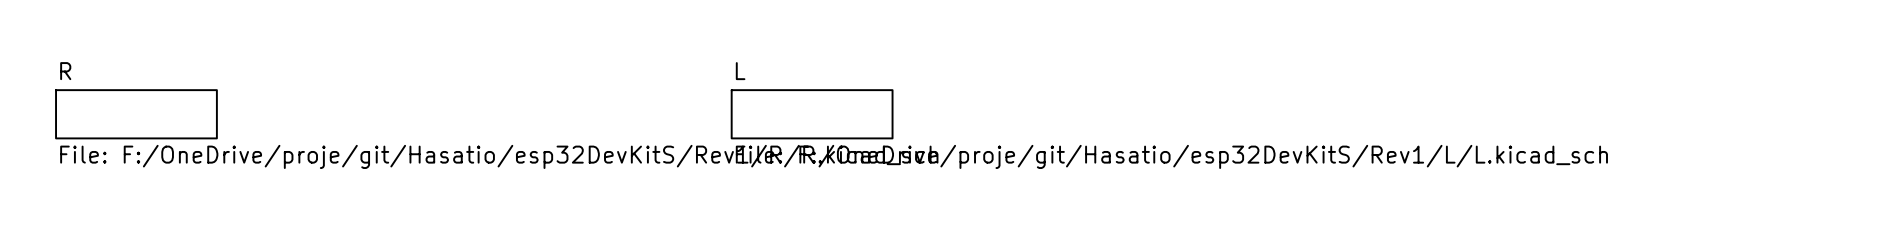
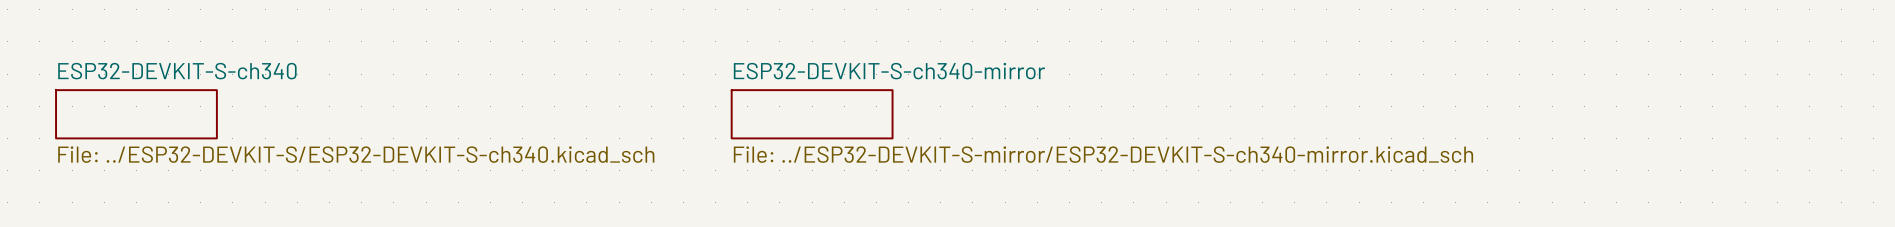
sheet R name: R (65, 71) -> ESP32-DEVKIT-S-ch340 (177, 71)
sheet L name: L (740, 71) -> ESP32-DEVKIT-S-ch340-mirror (889, 71)
sheet R value: File: F:/OneDrive/proje/git/Hasatio/esp32DevKitS/Rev1/R/R.kicad_sch (499, 156) -> File: ../ESP32-DEVKIT-S/ESP32-DEVKIT-S-ch340.kicad_sch (356, 154)
sheet L value: File: F:/OneDrive/proje/git/Hasatio/esp32DevKitS/Rev1/L/L.kicad_sch (1171, 156) -> File: ../ESP32-DEVKIT-S-mirror/ESP32-DEVKIT-S-ch340-mirror.kicad_sch (1103, 154)

